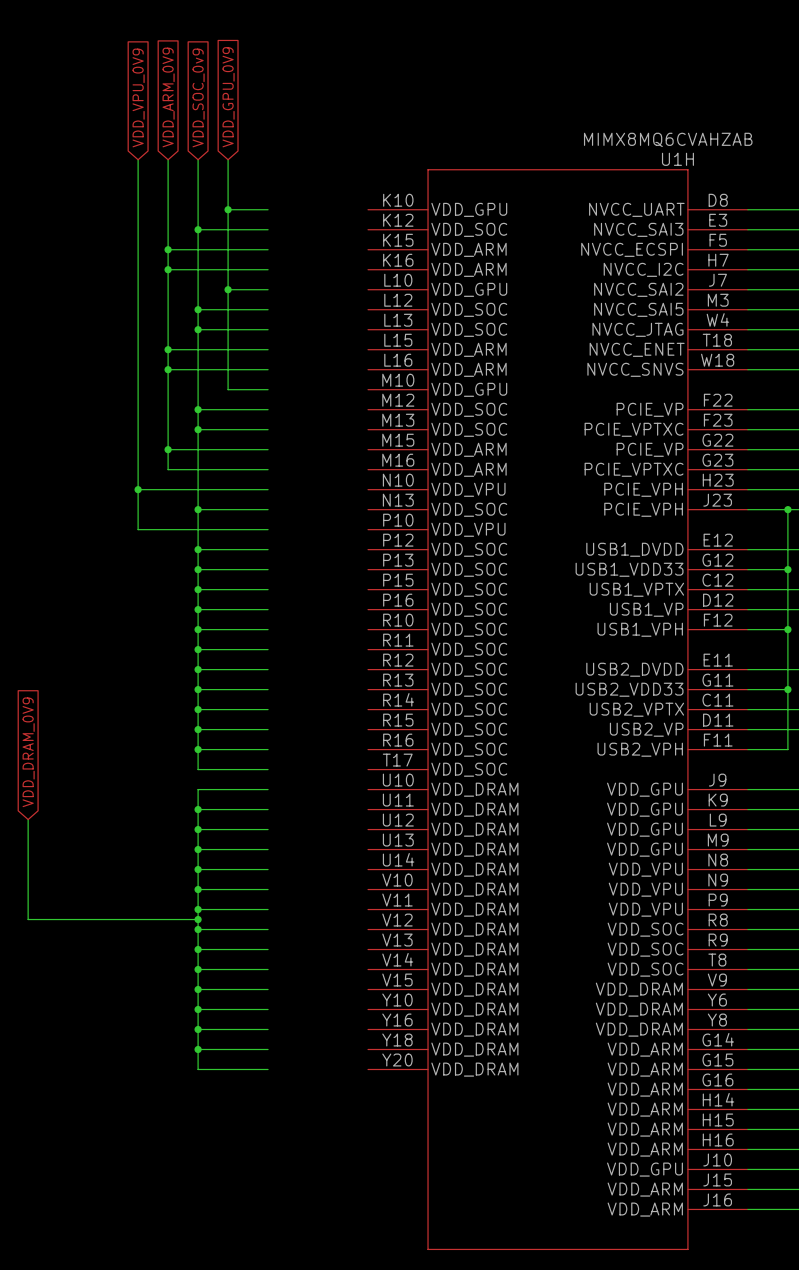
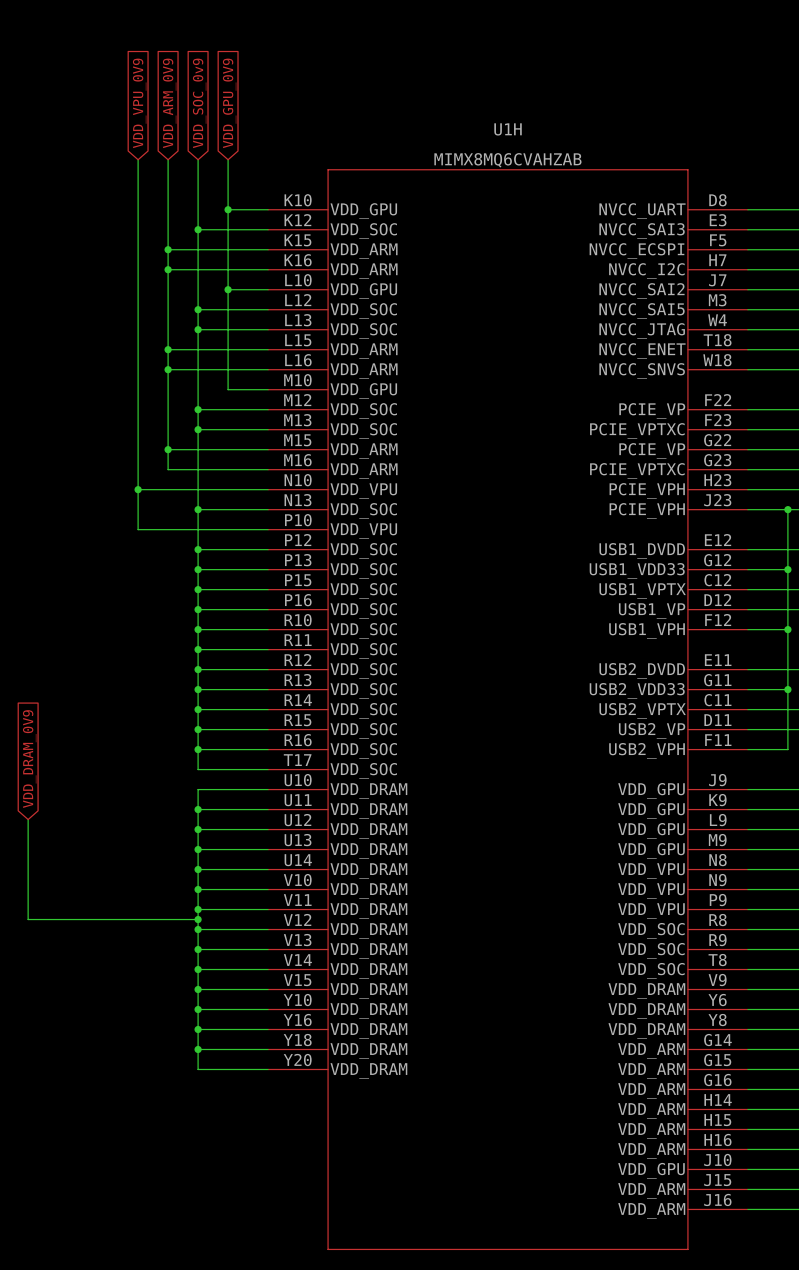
U1H value position: MIMX8MQ6CVAHZAB (668, 139) -> MIMX8MQ6CVAHZAB (507, 160)
U1H name position: U1H (677, 159) -> U1H (508, 129)
U1H symbol: [368, 169, 748, 1250] -> [268, 169, 748, 1250]

